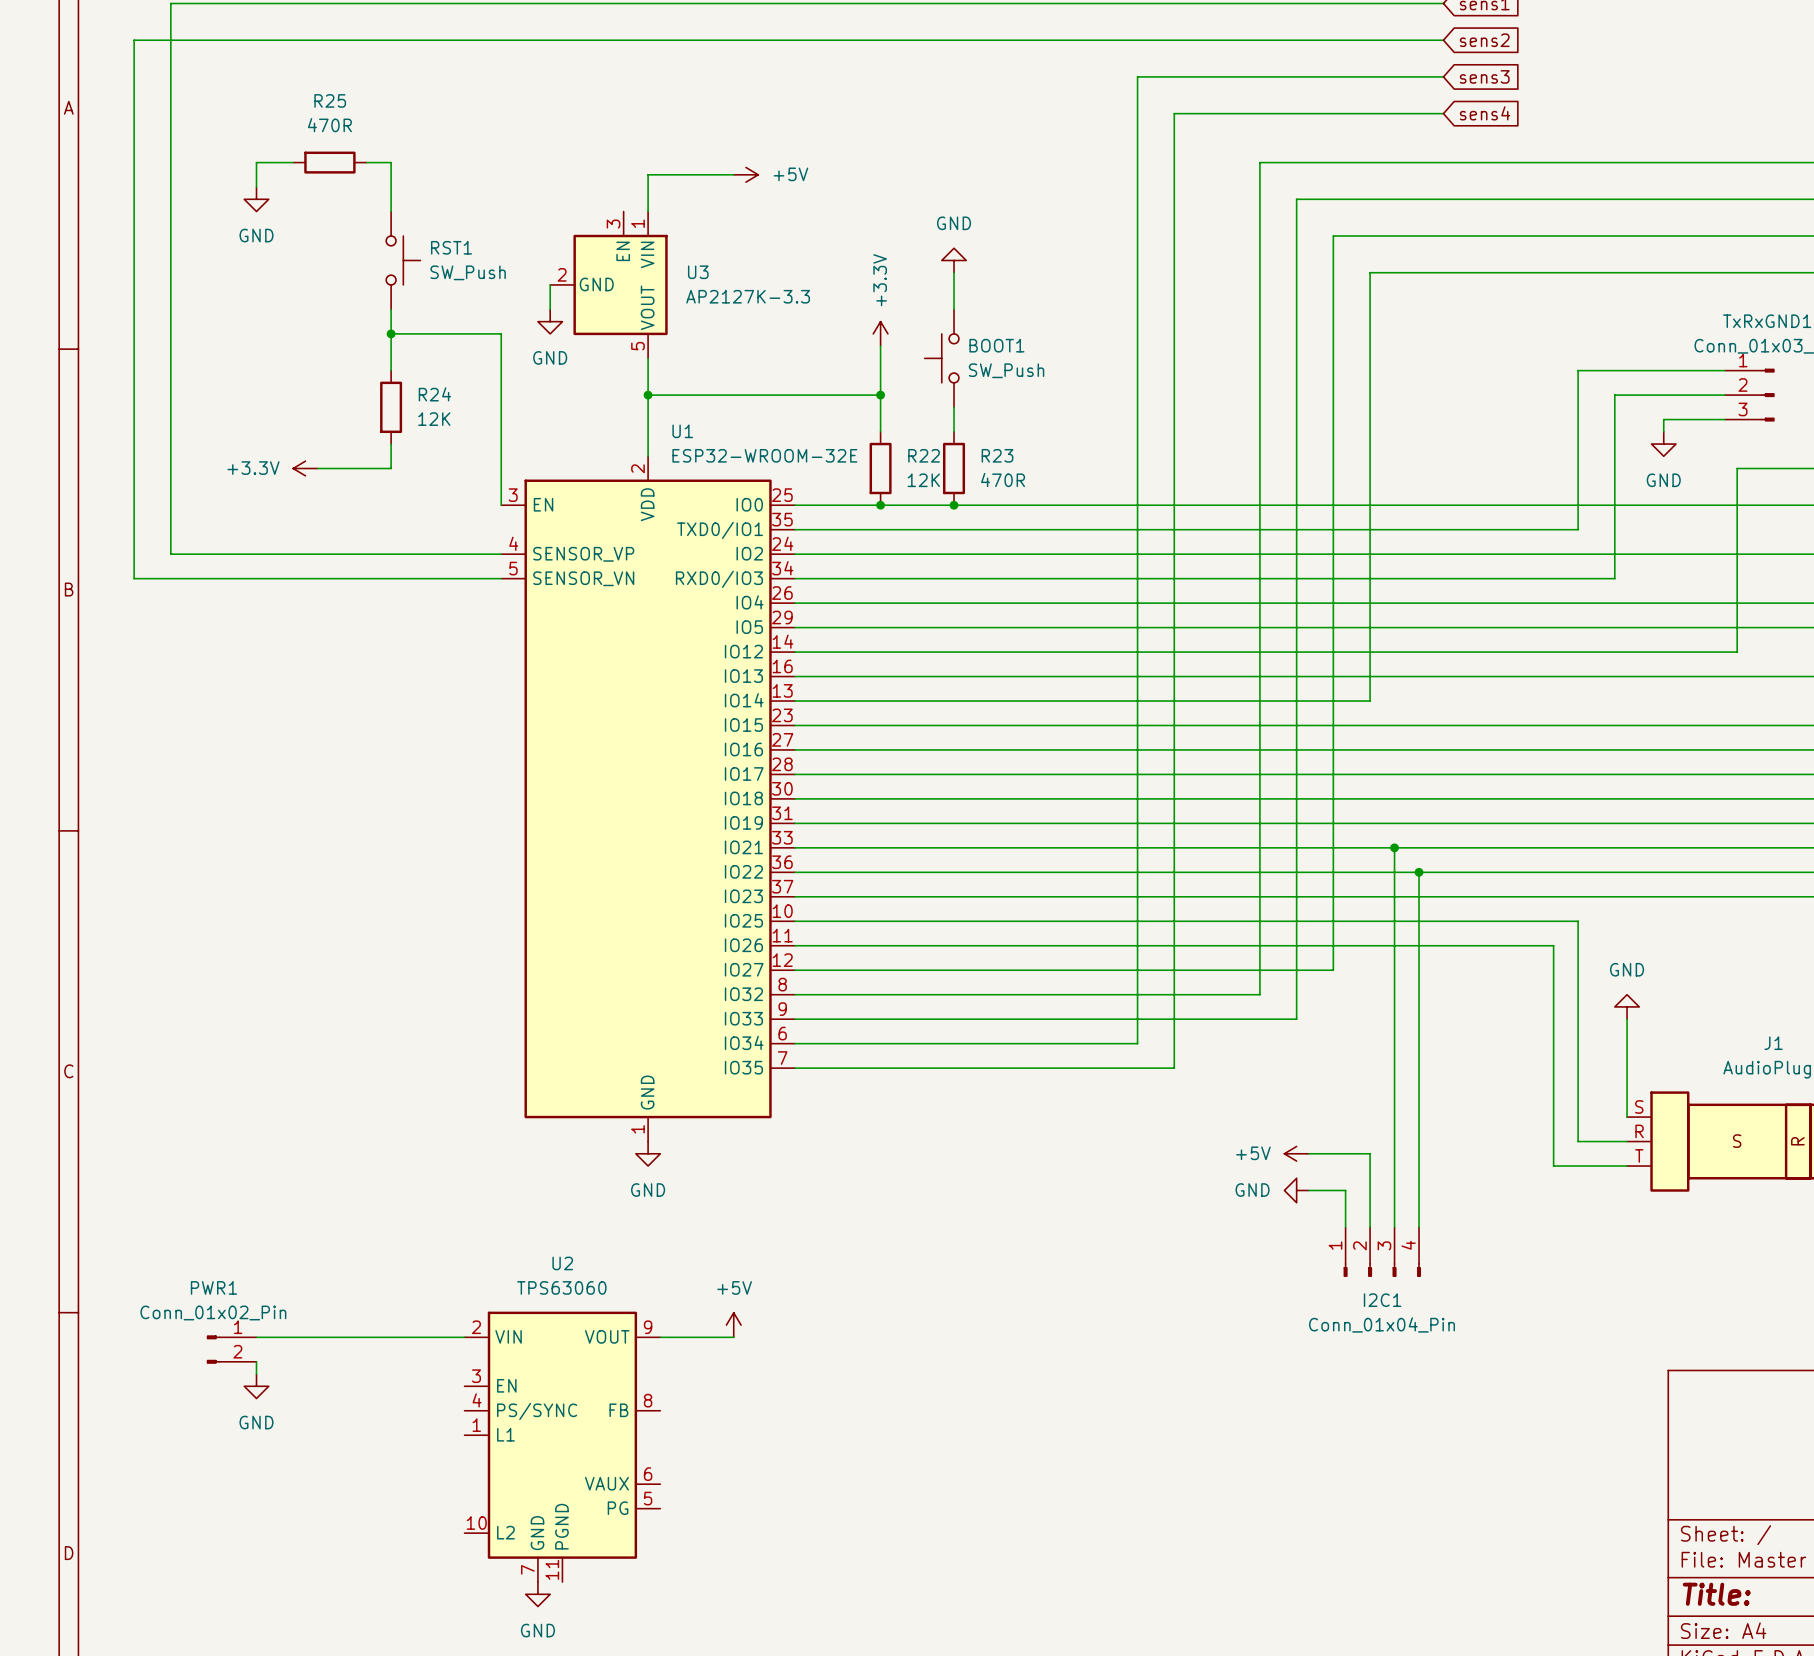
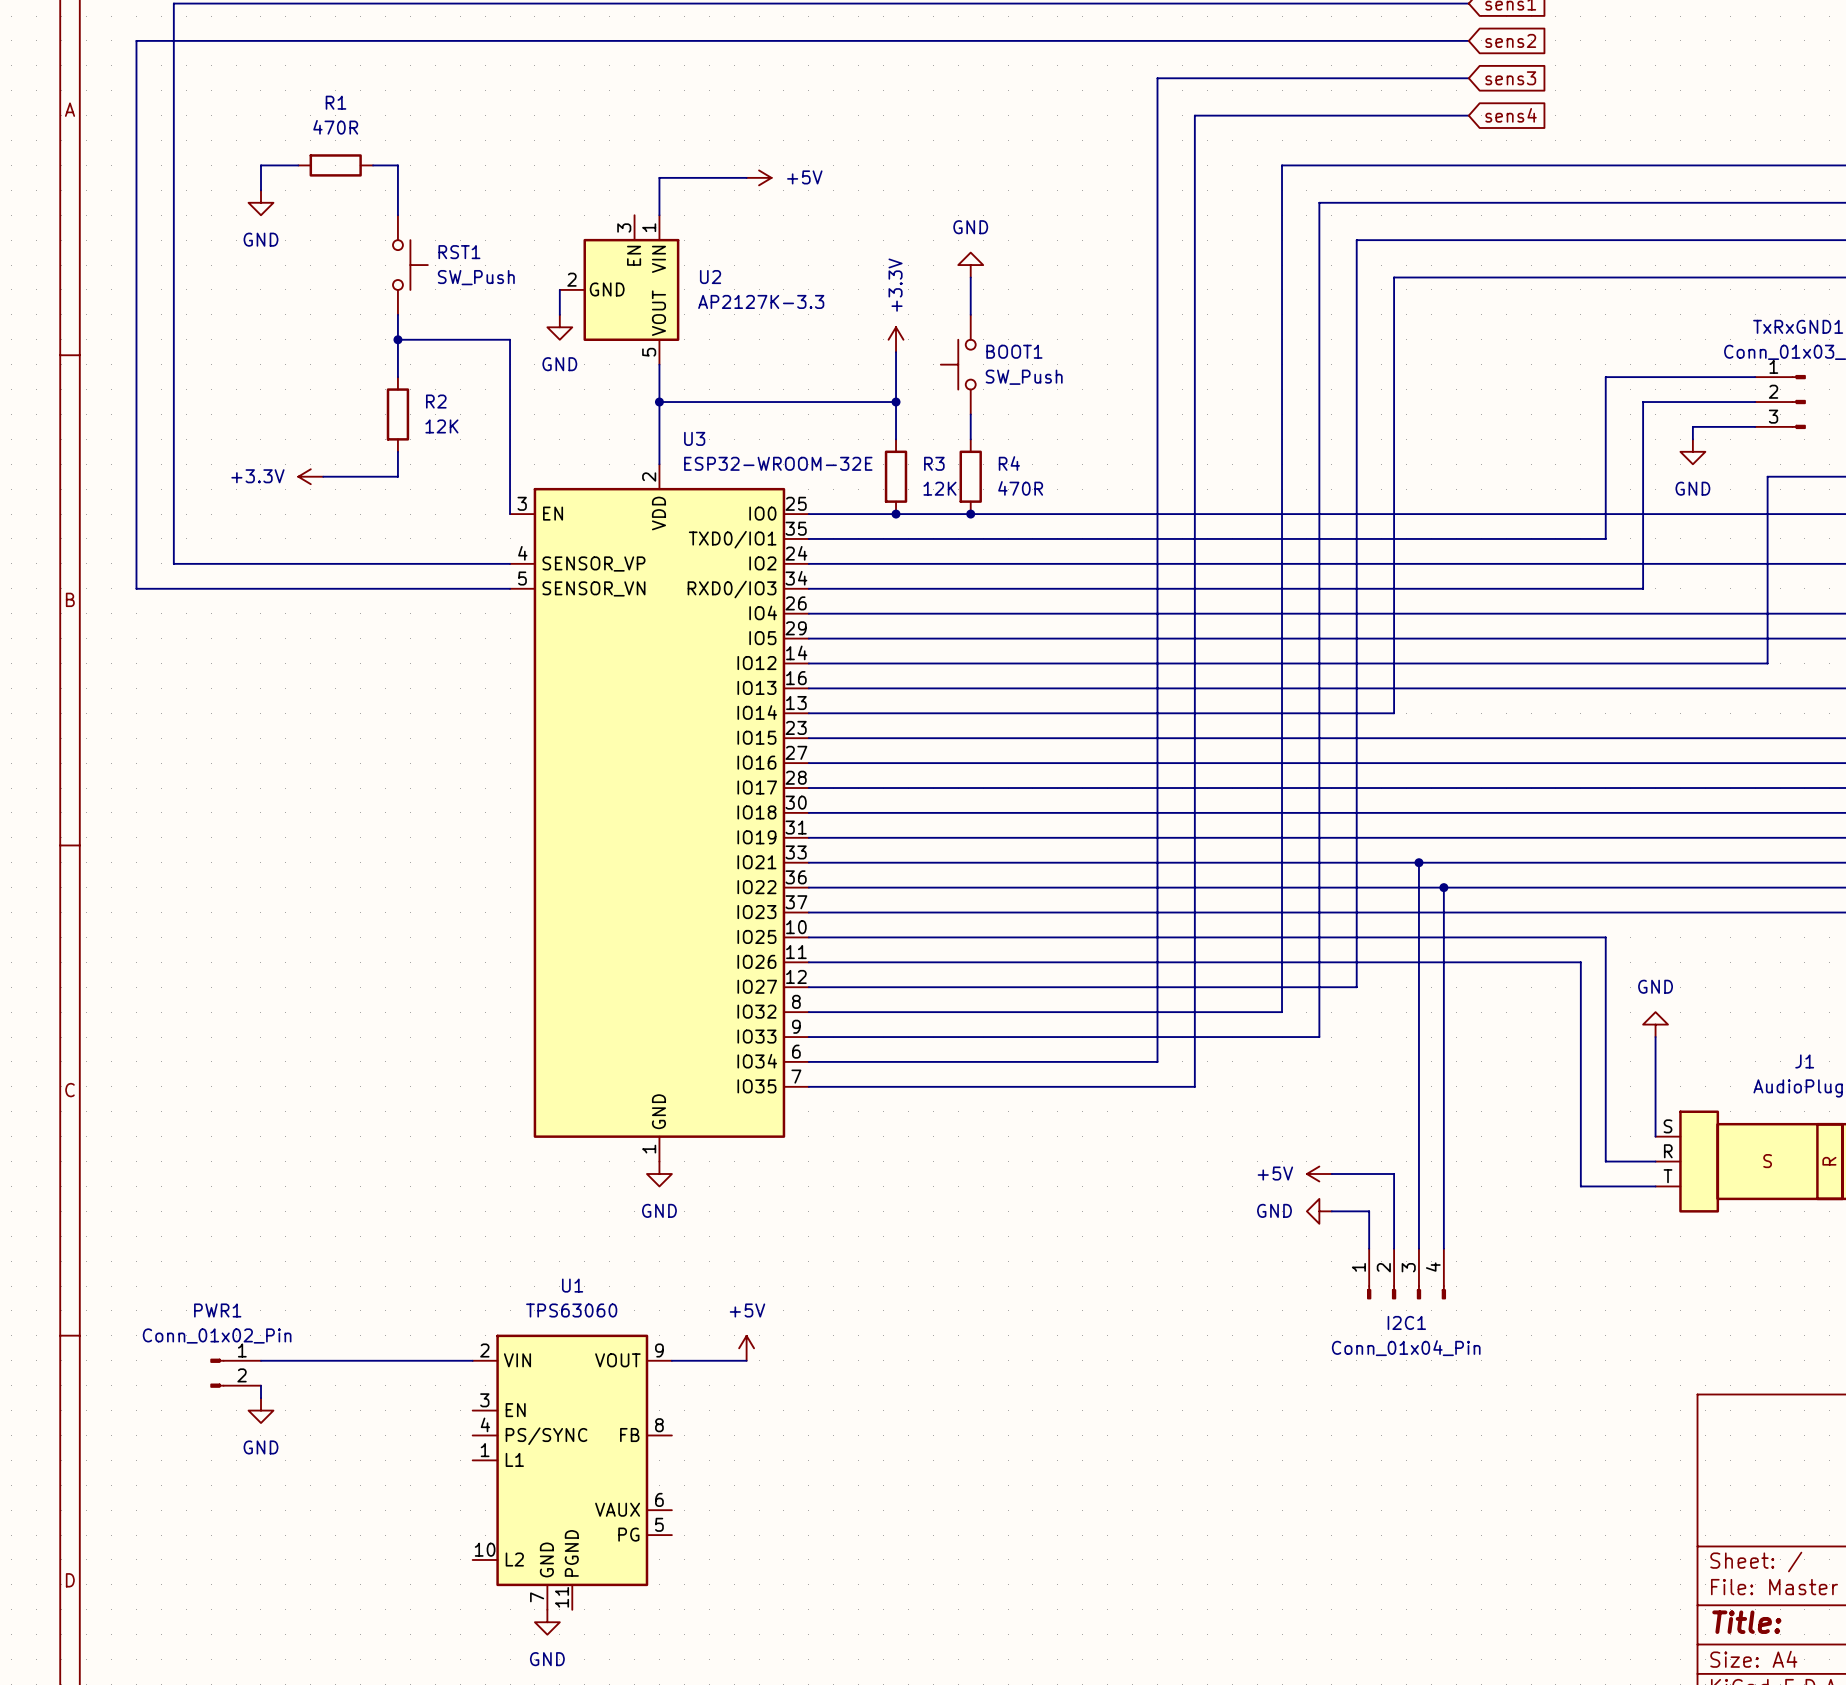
R25 name: R25 (330, 100) -> R1 (336, 102)
U3 name: U3 (698, 272) -> U2 (710, 277)
R24 name: R24 (434, 394) -> R2 (436, 401)
U1 name: U1 (682, 431) -> U3 (694, 438)
R22 name: R22 (924, 455) -> R3 (934, 463)
R23 name: R23 (997, 455) -> R4 (1009, 463)
U2 name: U2 (562, 1263) -> U1 (572, 1285)

